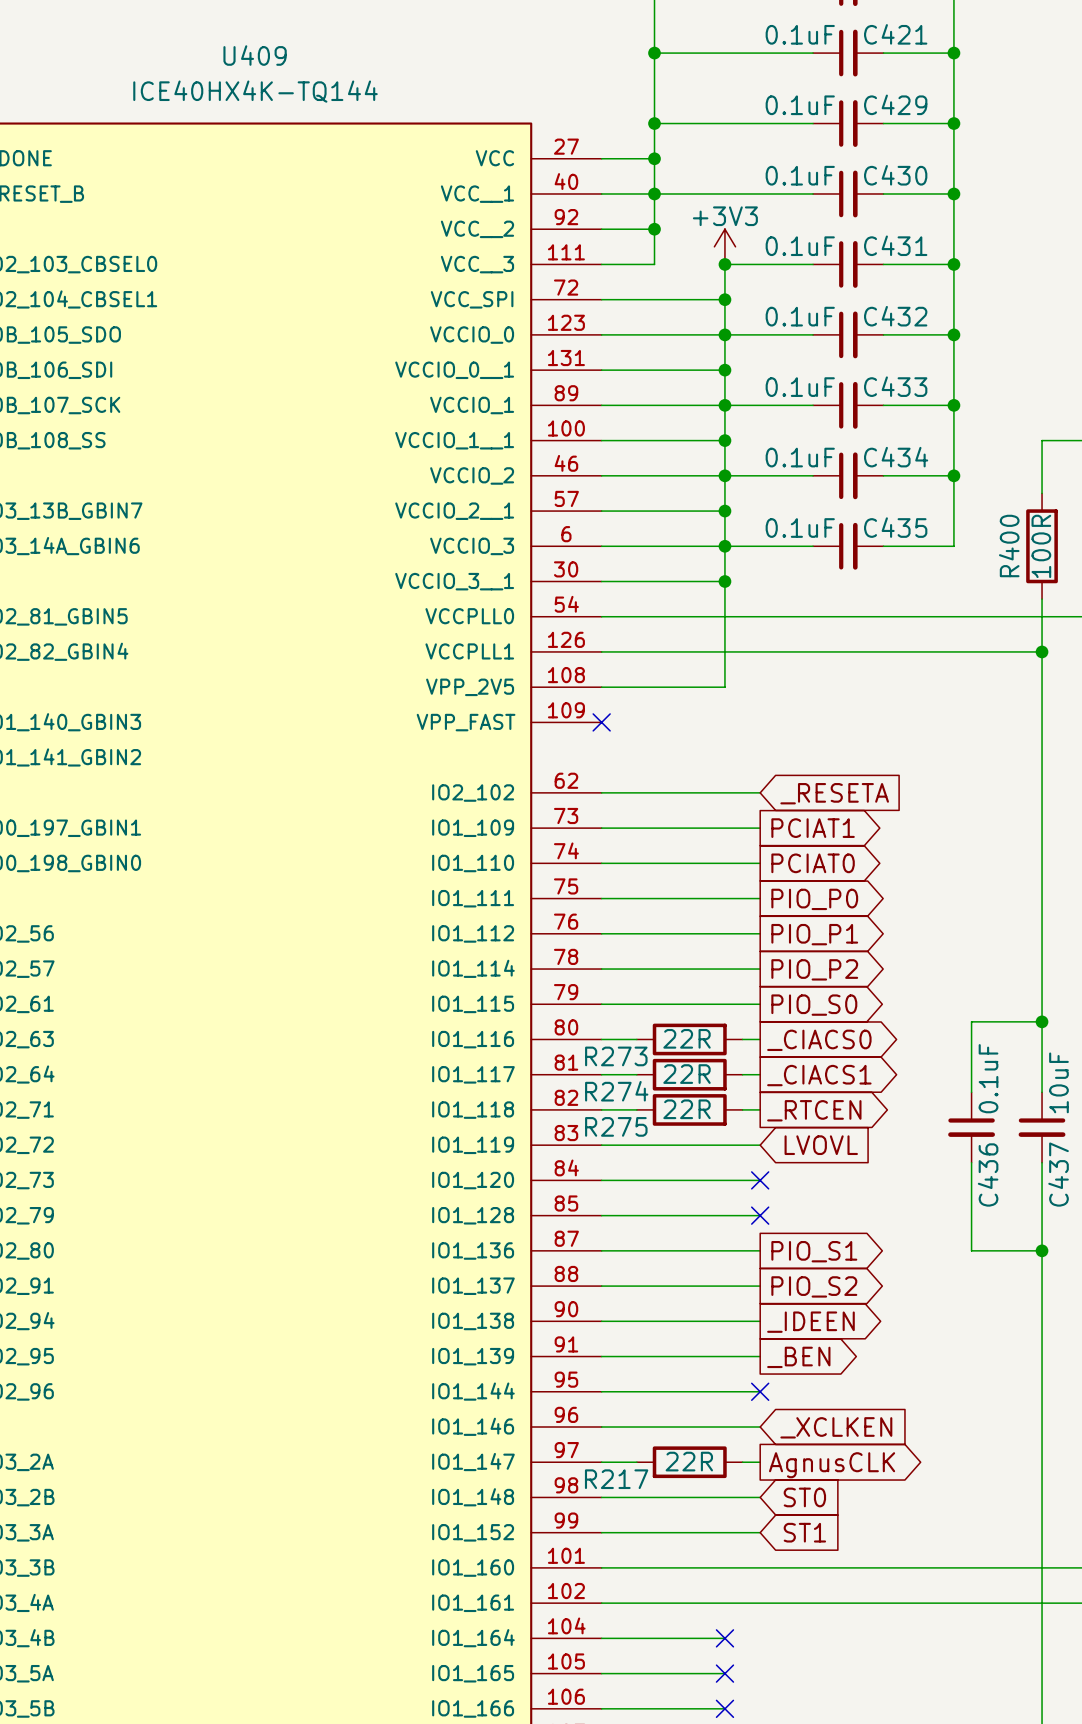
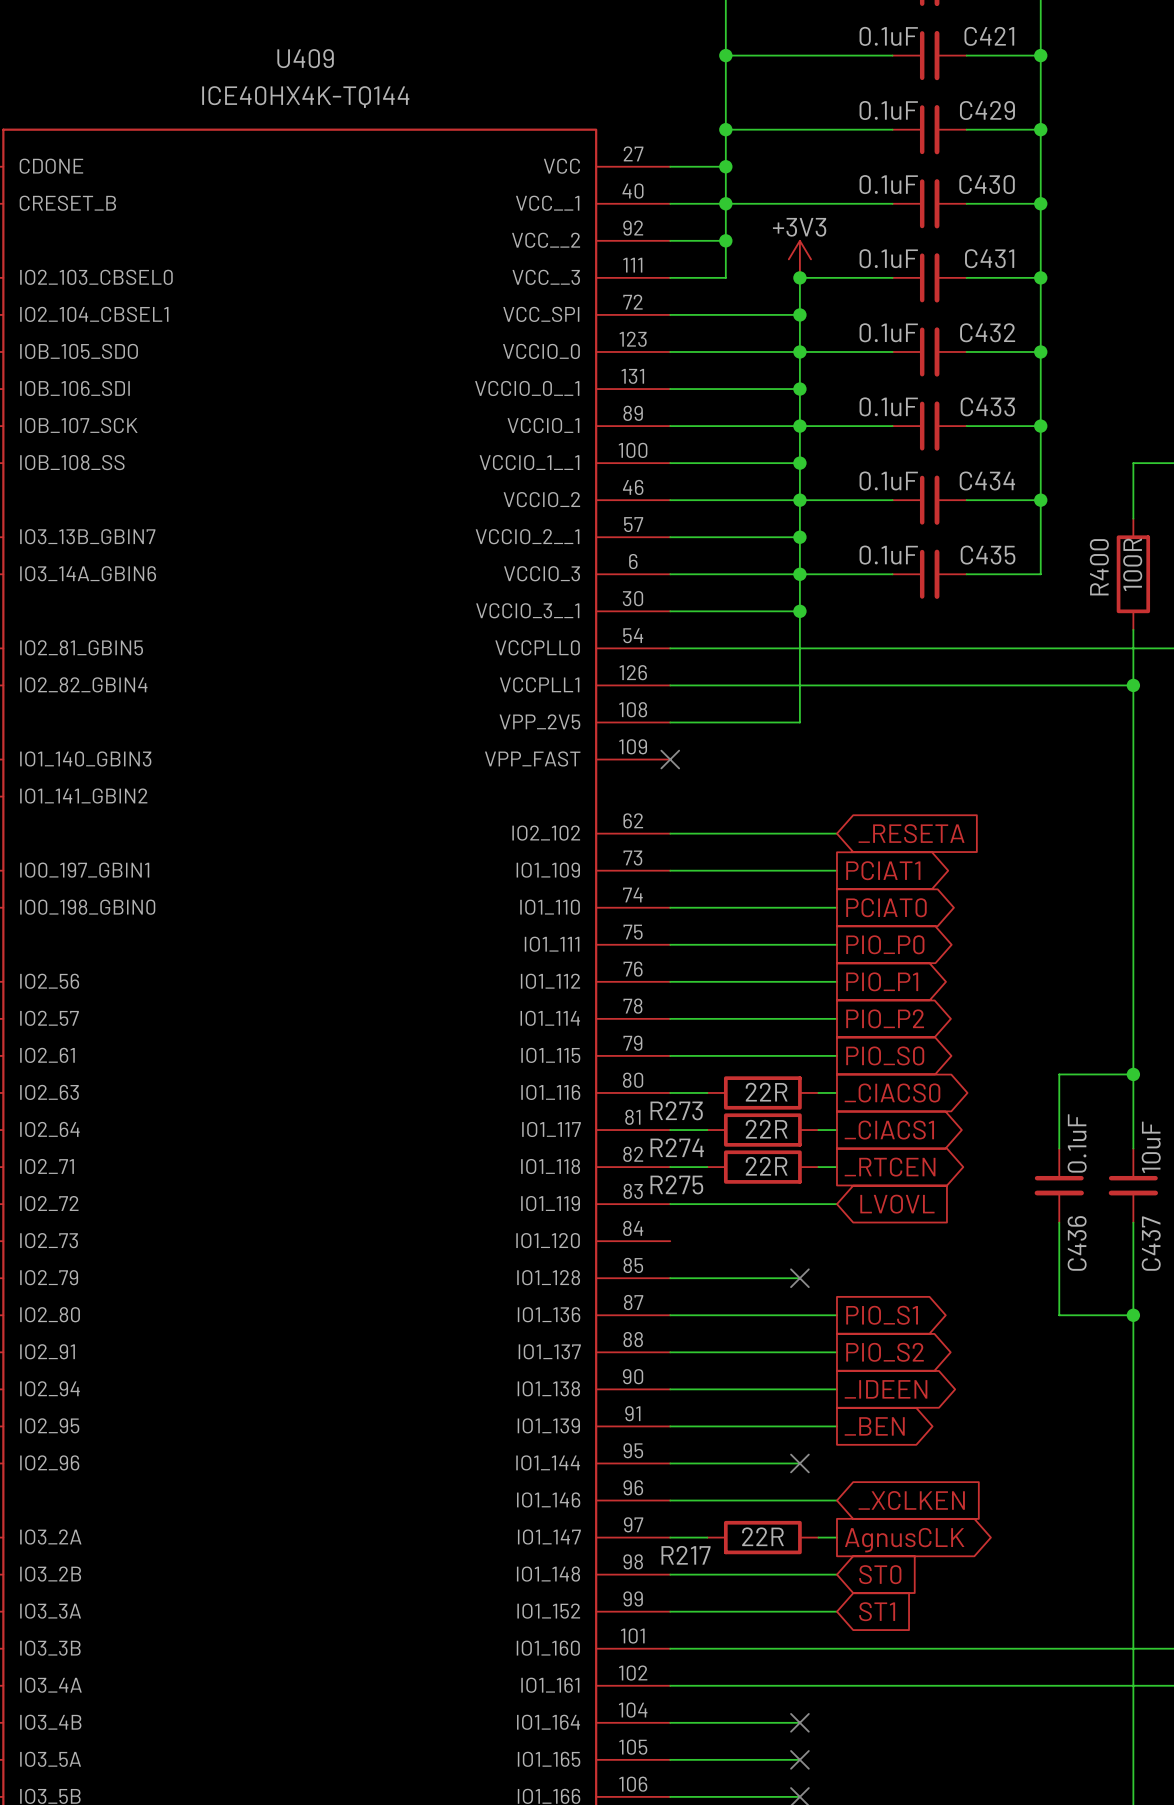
wire: (601, 1180) (760, 1180) -> none
no-connect mark: (760, 1180) -> none
wire: (724, 1215) (760, 1215) -> none
no-connect mark: none -> (799, 1278)
no-connect mark: (760, 1215) -> none
wire: (724, 1391) (760, 1391) -> none
no-connect mark position: (760, 1391) -> (799, 1463)

